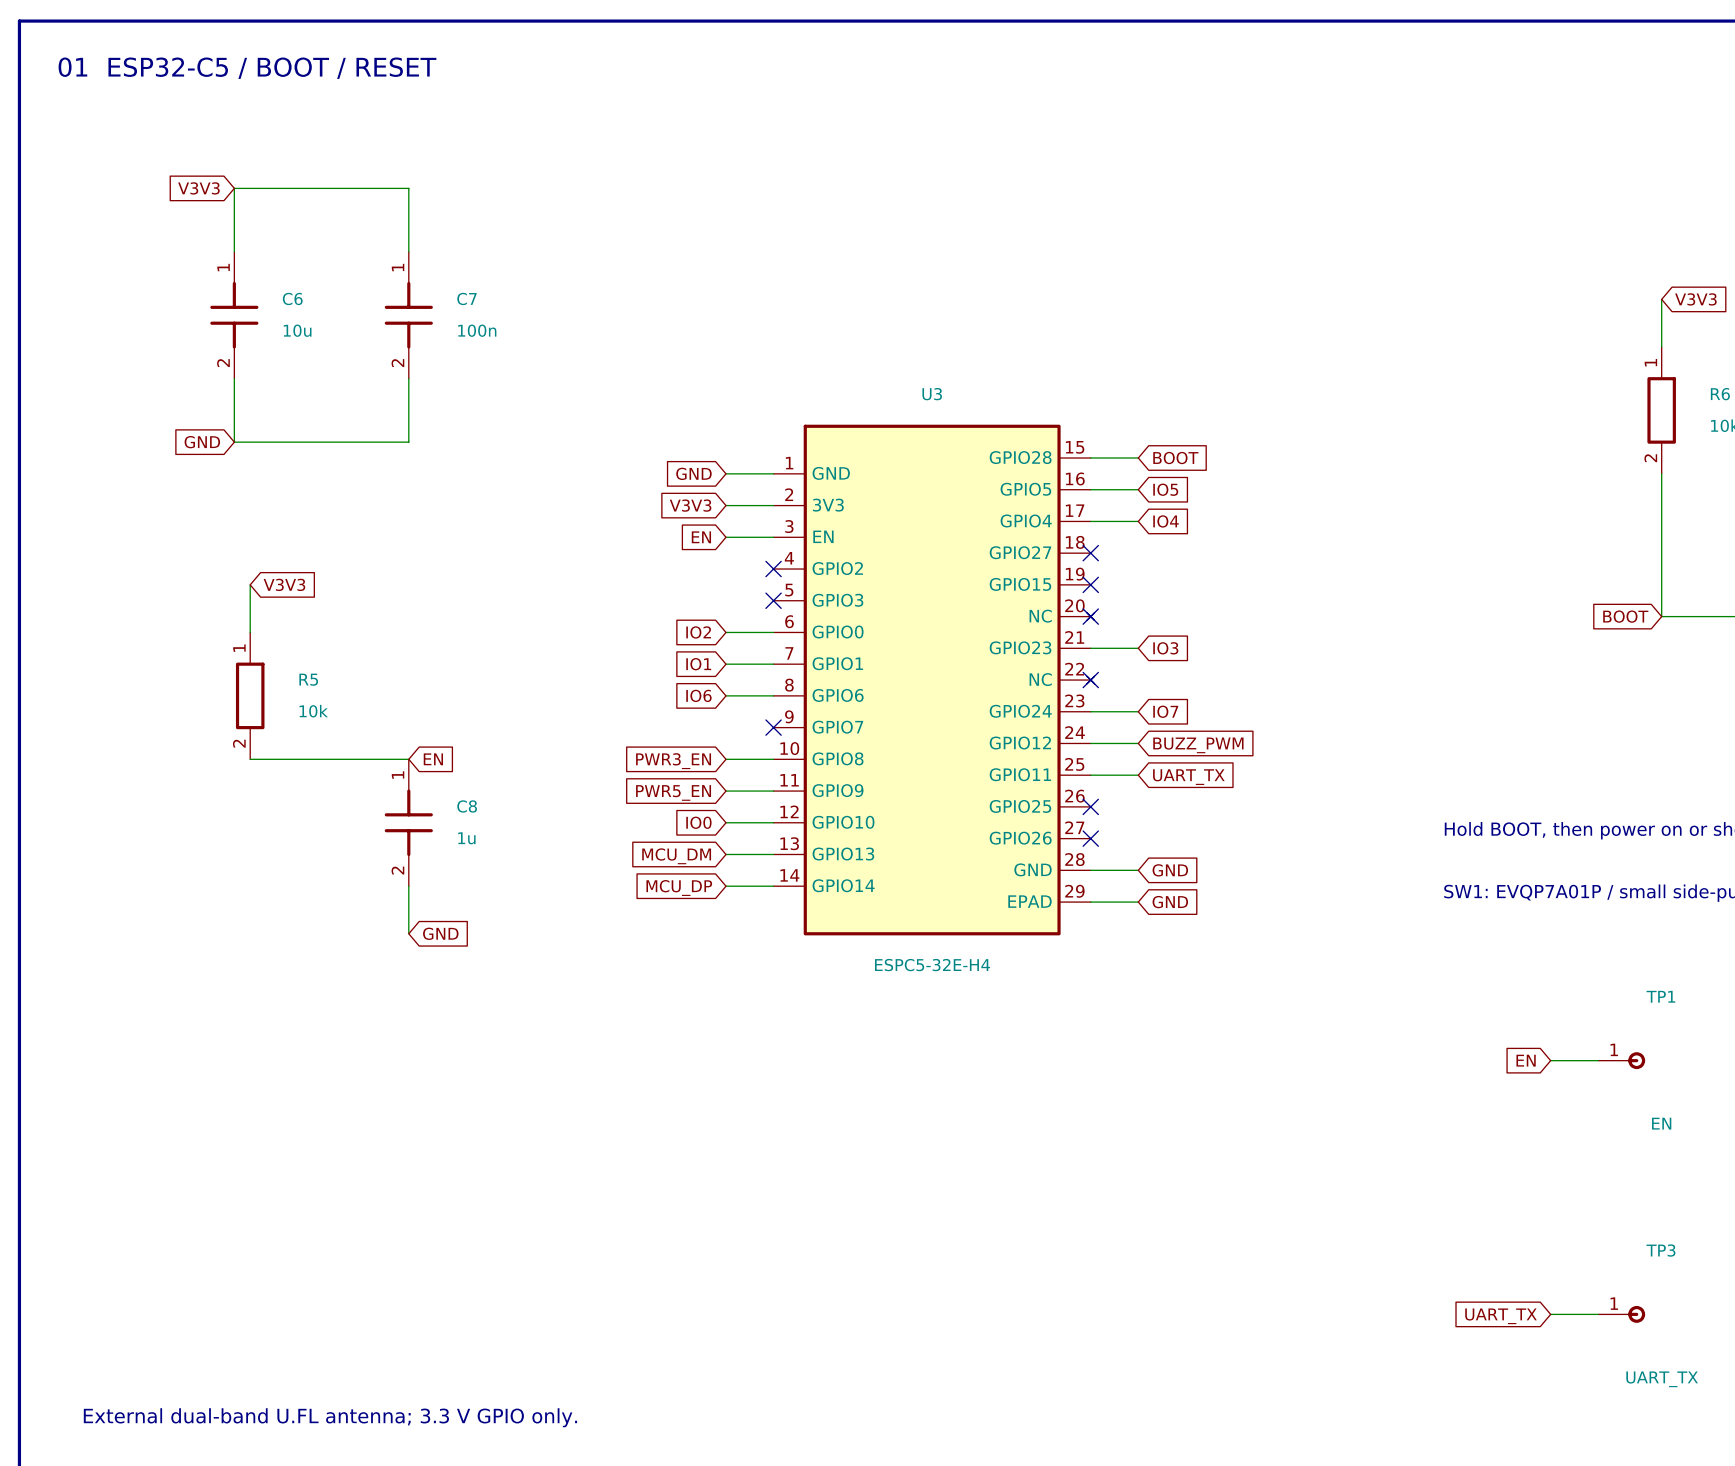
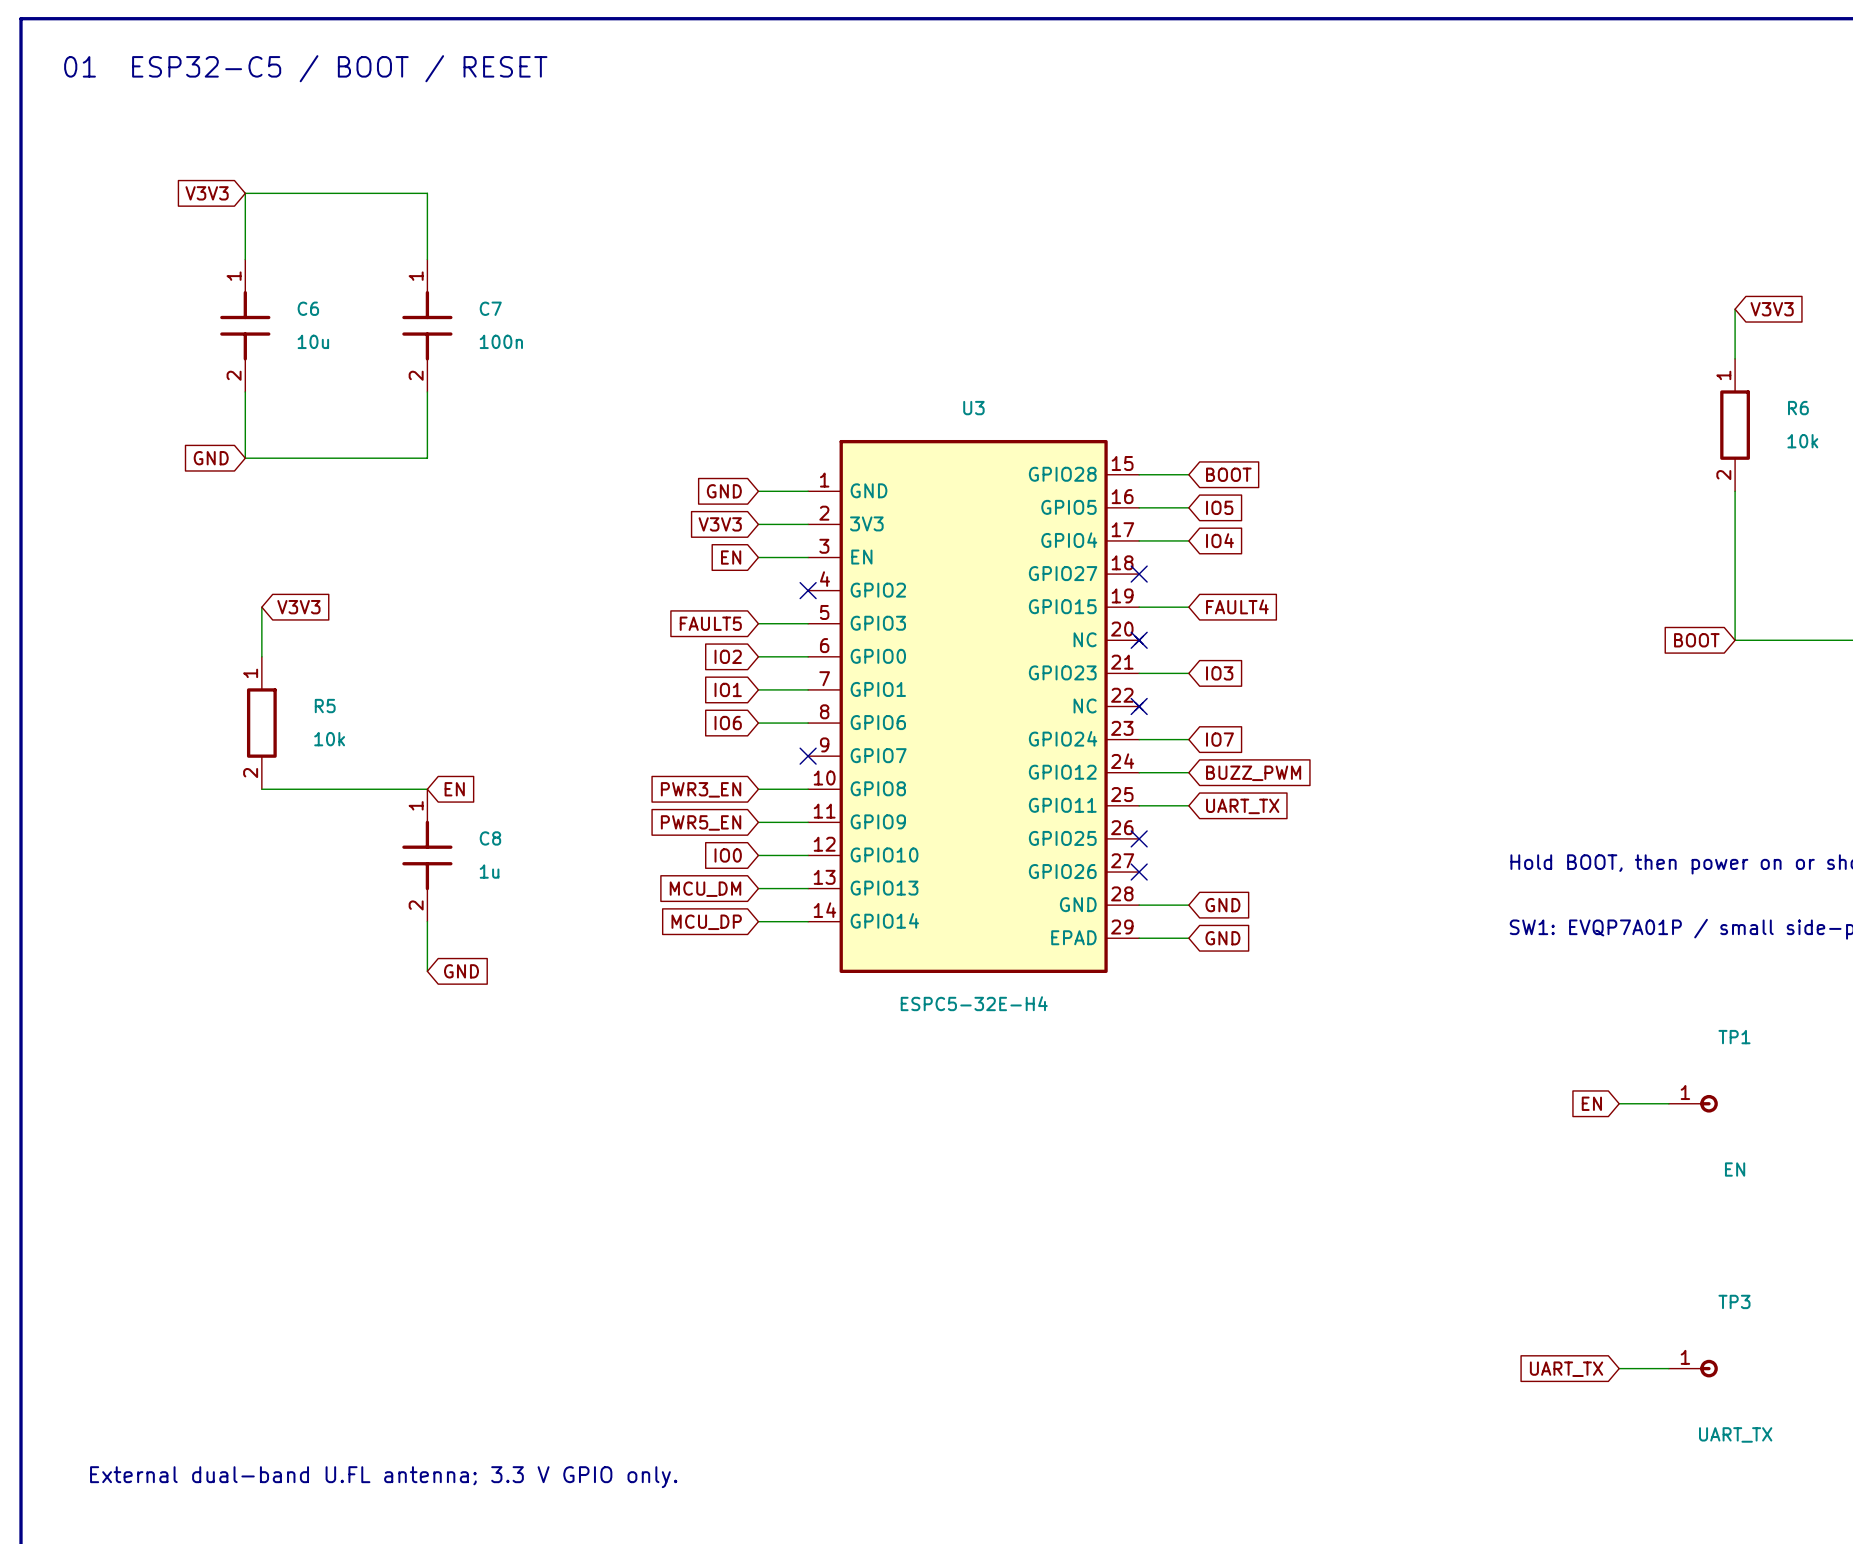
wire: none -> (1139, 607) (1188, 607)
no-connect mark: (1090, 584) -> none
global label: none -> FAULT4 (1237, 606)
global label: none -> FAULT5 (710, 623)
wire: none -> (758, 623) (808, 623)
no-connect mark: (773, 600) -> none

